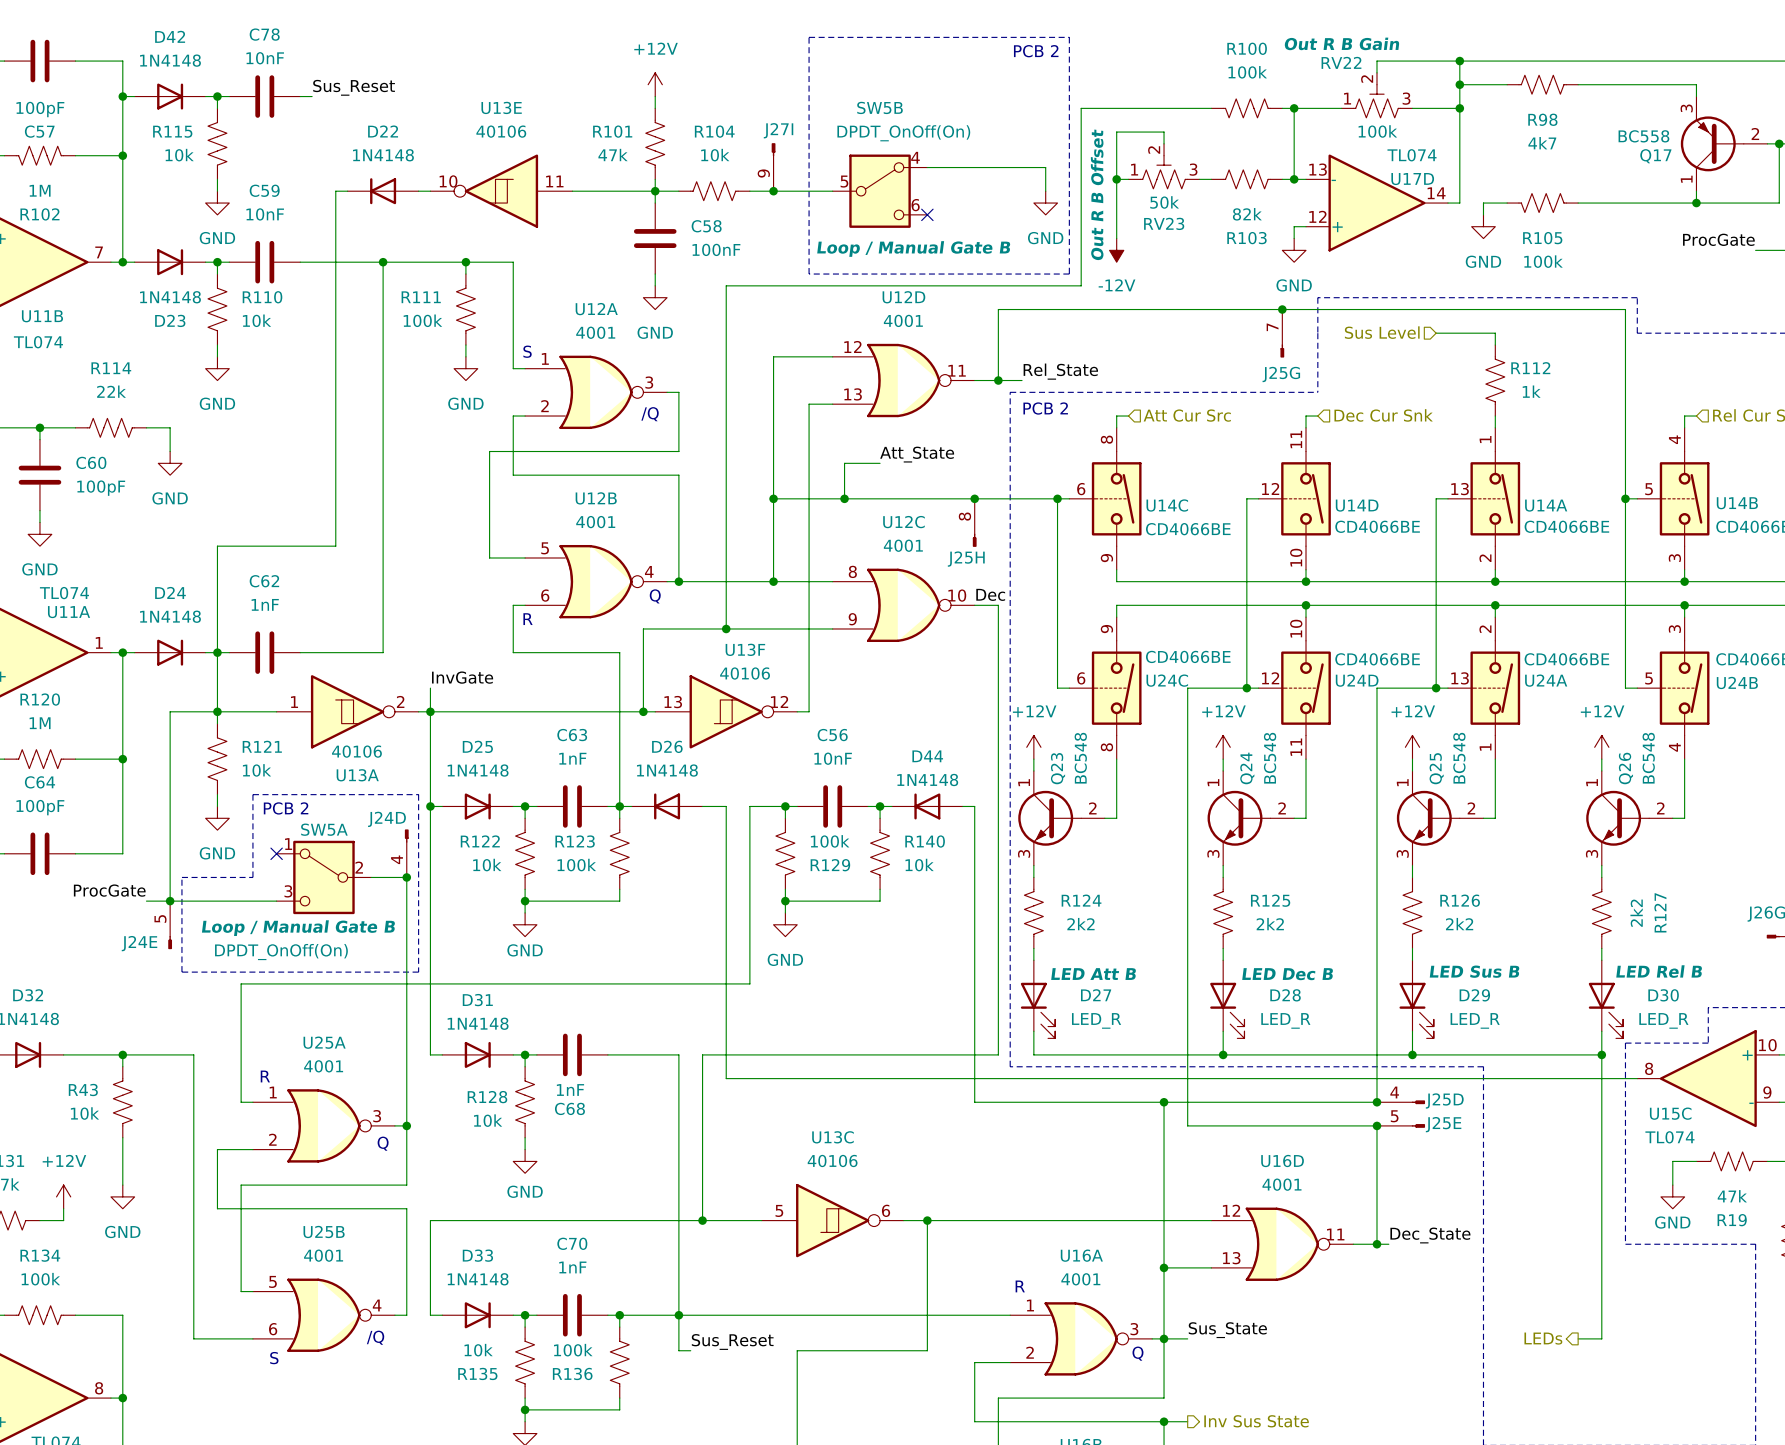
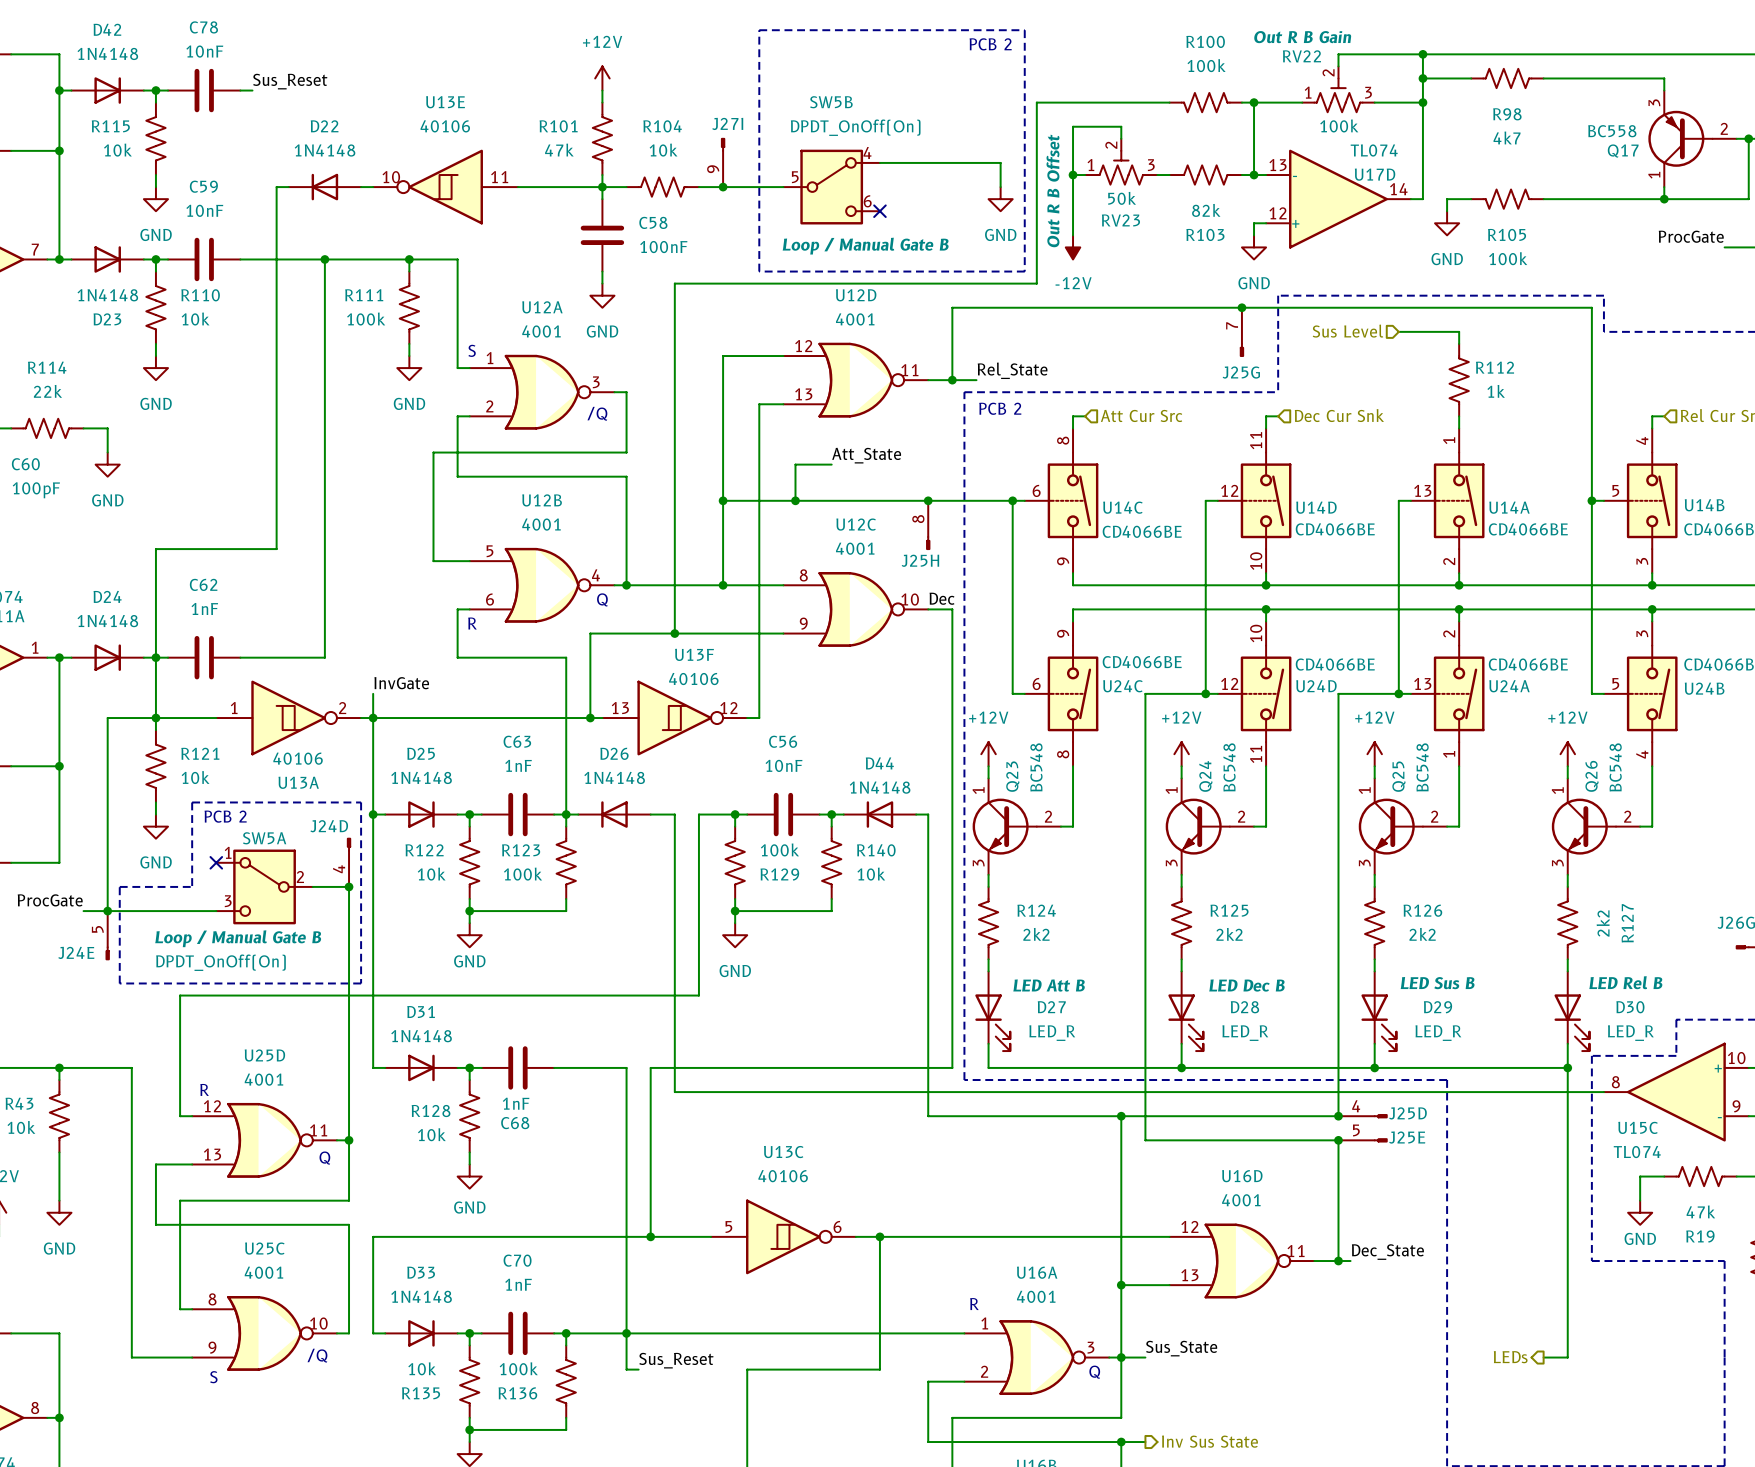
U25A name: U25A (324, 1042) -> U25D (264, 1055)
U25A pin number: 1 (273, 1092) -> 12 (212, 1106)
U25A pin number: 3 (377, 1116) -> 11 (318, 1130)
U25A pin number: 2 (272, 1139) -> 13 (212, 1154)
U25B name: U25B (324, 1231) -> U25C (264, 1248)
U25B pin number: 5 (272, 1281) -> 8 (212, 1299)
U25B pin number: 4 (377, 1305) -> 10 (318, 1323)
U25B pin number: 6 (273, 1329) -> 9 (212, 1347)

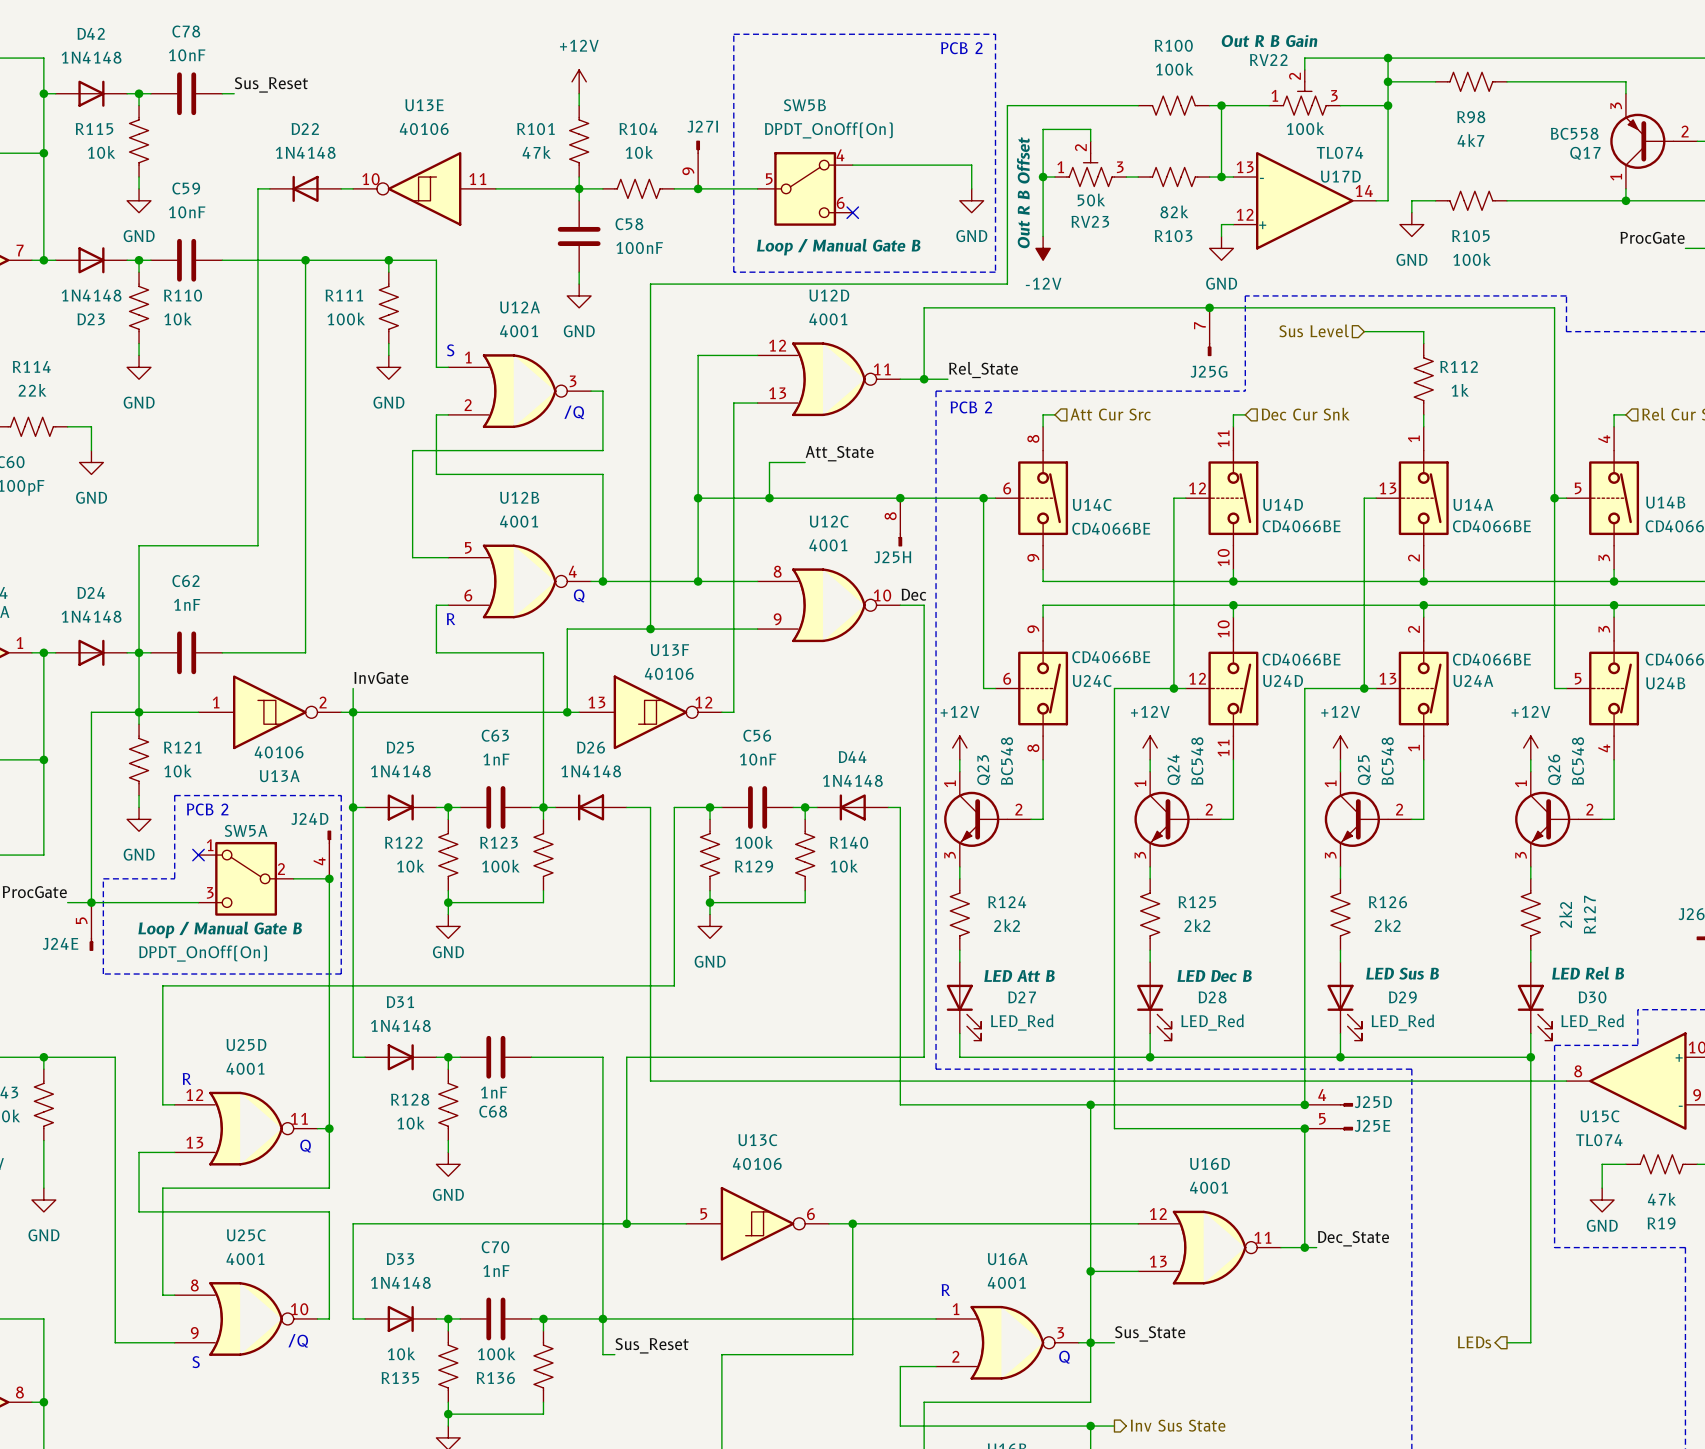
D27 value: LED_R (1052, 1033) -> LED_Red (1022, 1022)
D28 value: LED_R (1245, 1033) -> LED_Red (1212, 1022)
D29 value: LED_R (1438, 1033) -> LED_Red (1402, 1022)
D30 value: LED_R (1630, 1033) -> LED_Red (1592, 1022)

